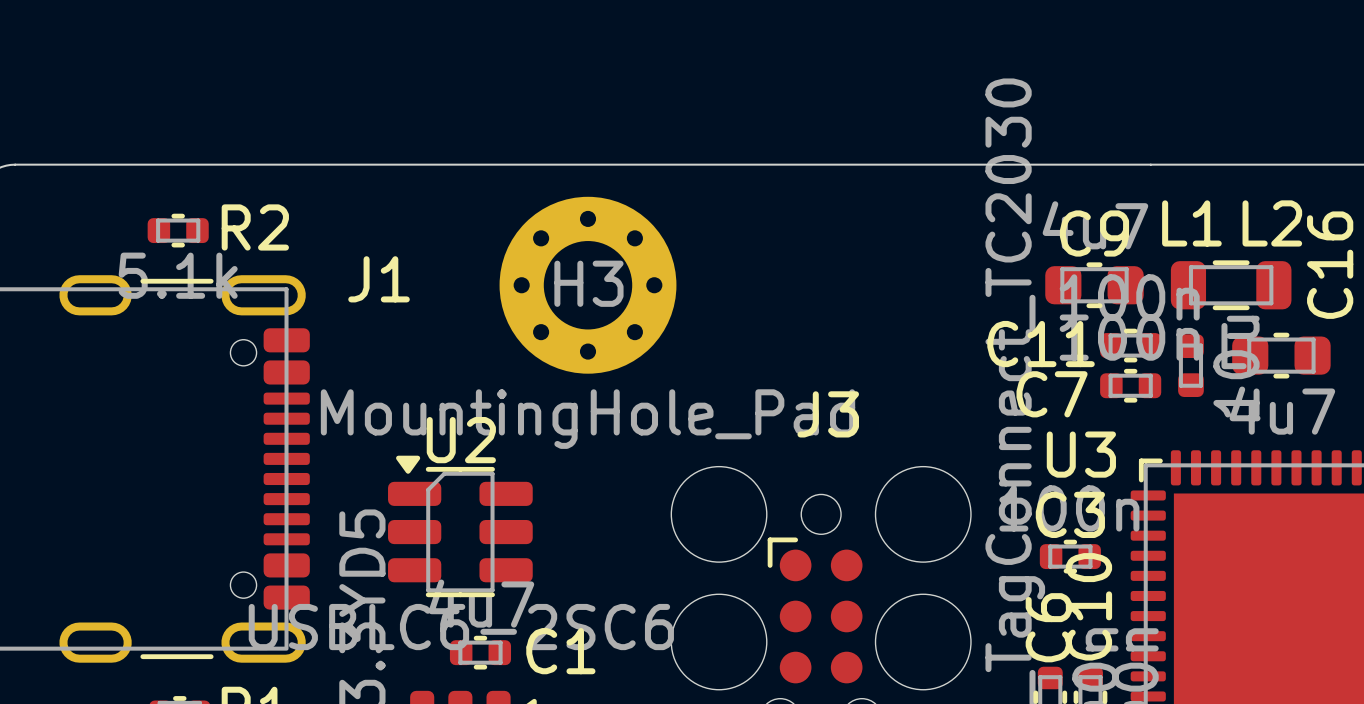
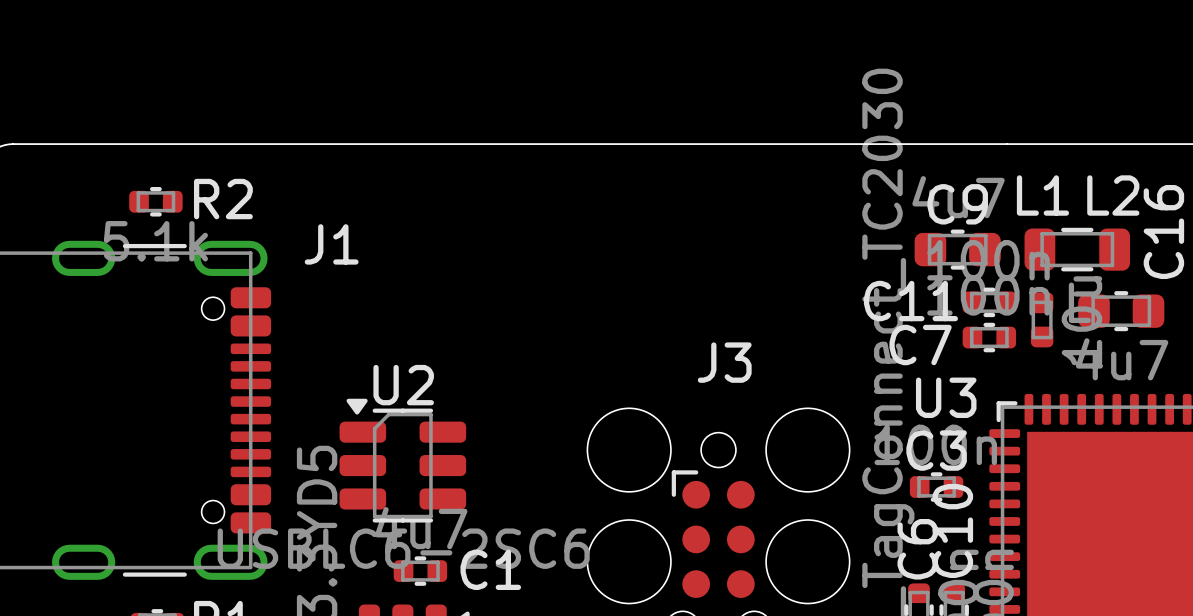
H3: MountingHole_Pad (588, 285) -> none

